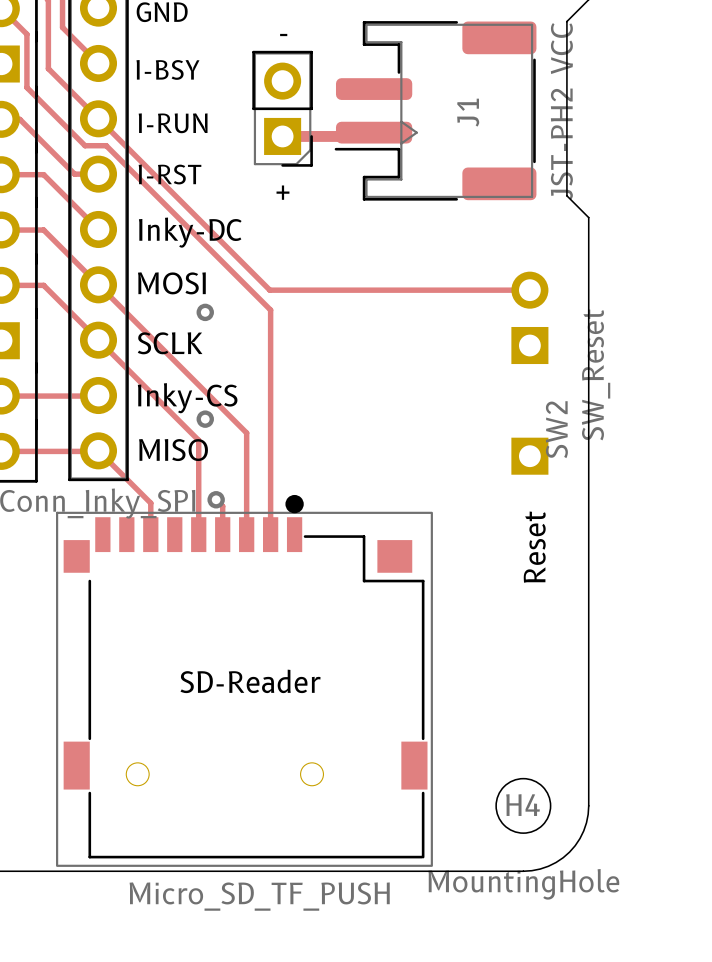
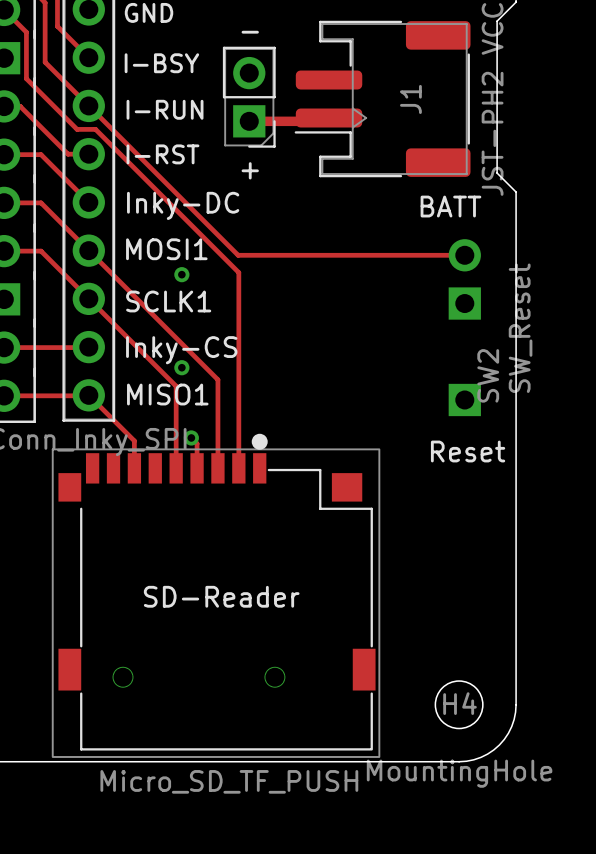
text: none -> BATT (450, 206)
text: MOSI (171, 283) -> MOSI1 (166, 249)
text: SCLK (170, 343) -> SCLK1 (168, 301)
text: MISO (173, 450) -> MISO1 (167, 394)
text rotation: 0° (534, 547) -> 90° clockwise (468, 451)

